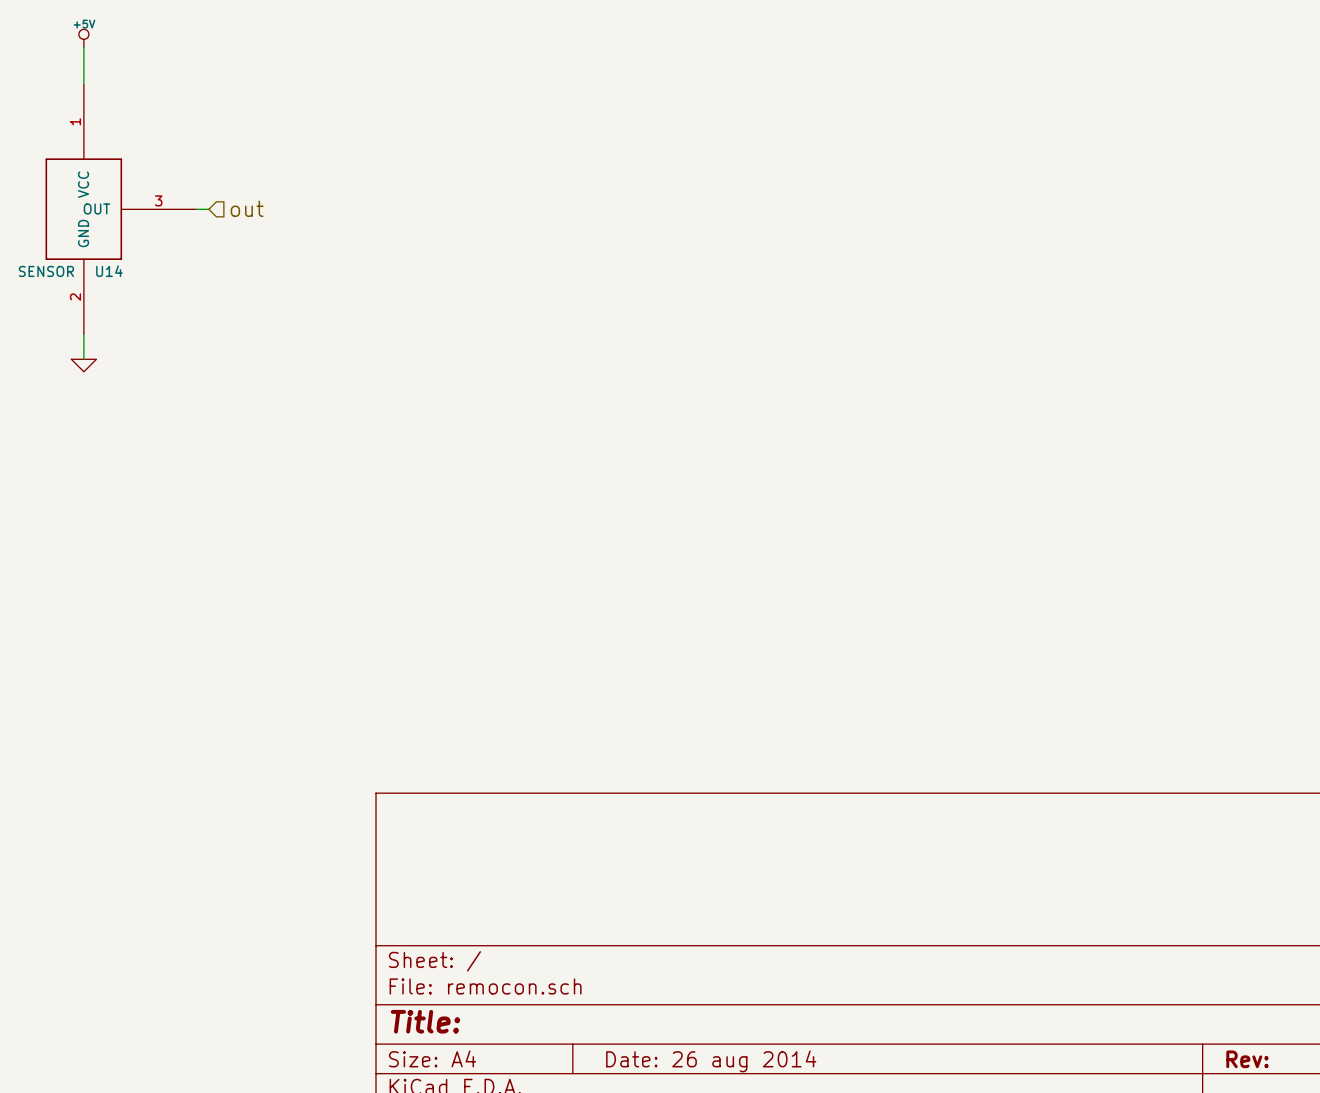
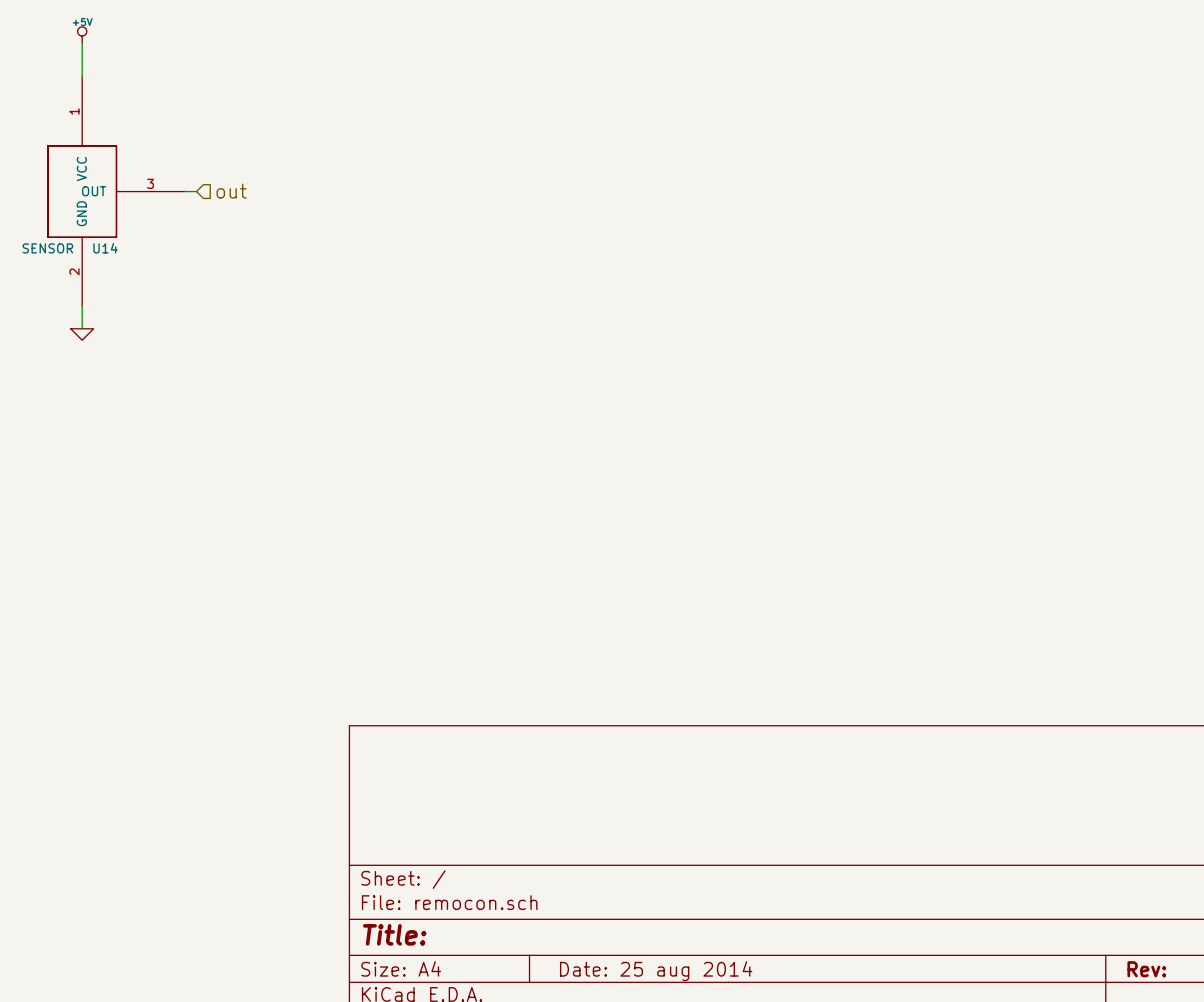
title block: Date: 26 aug 2014 (711, 1061) -> Date: 25 aug 2014 (656, 971)

